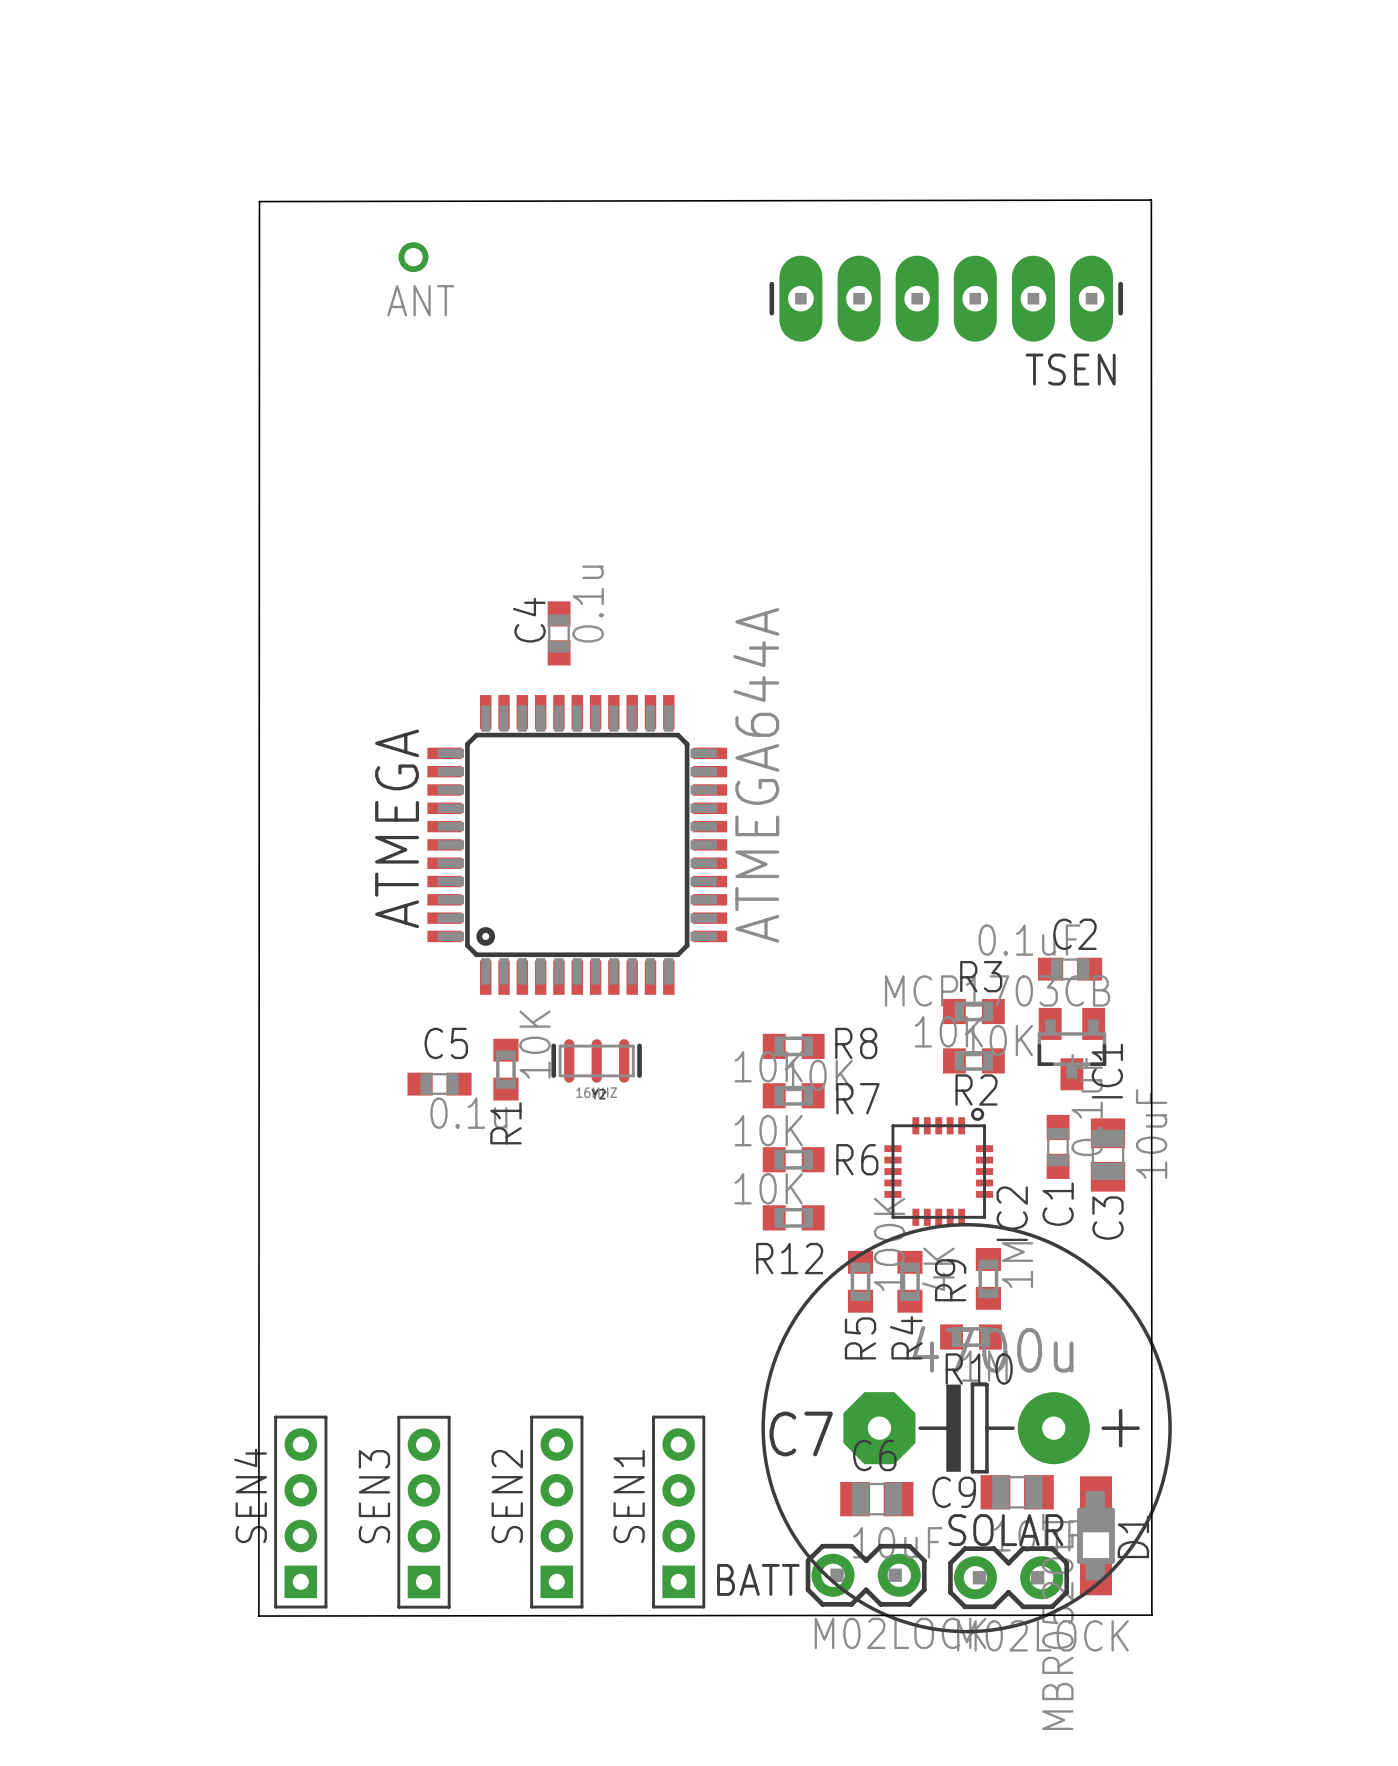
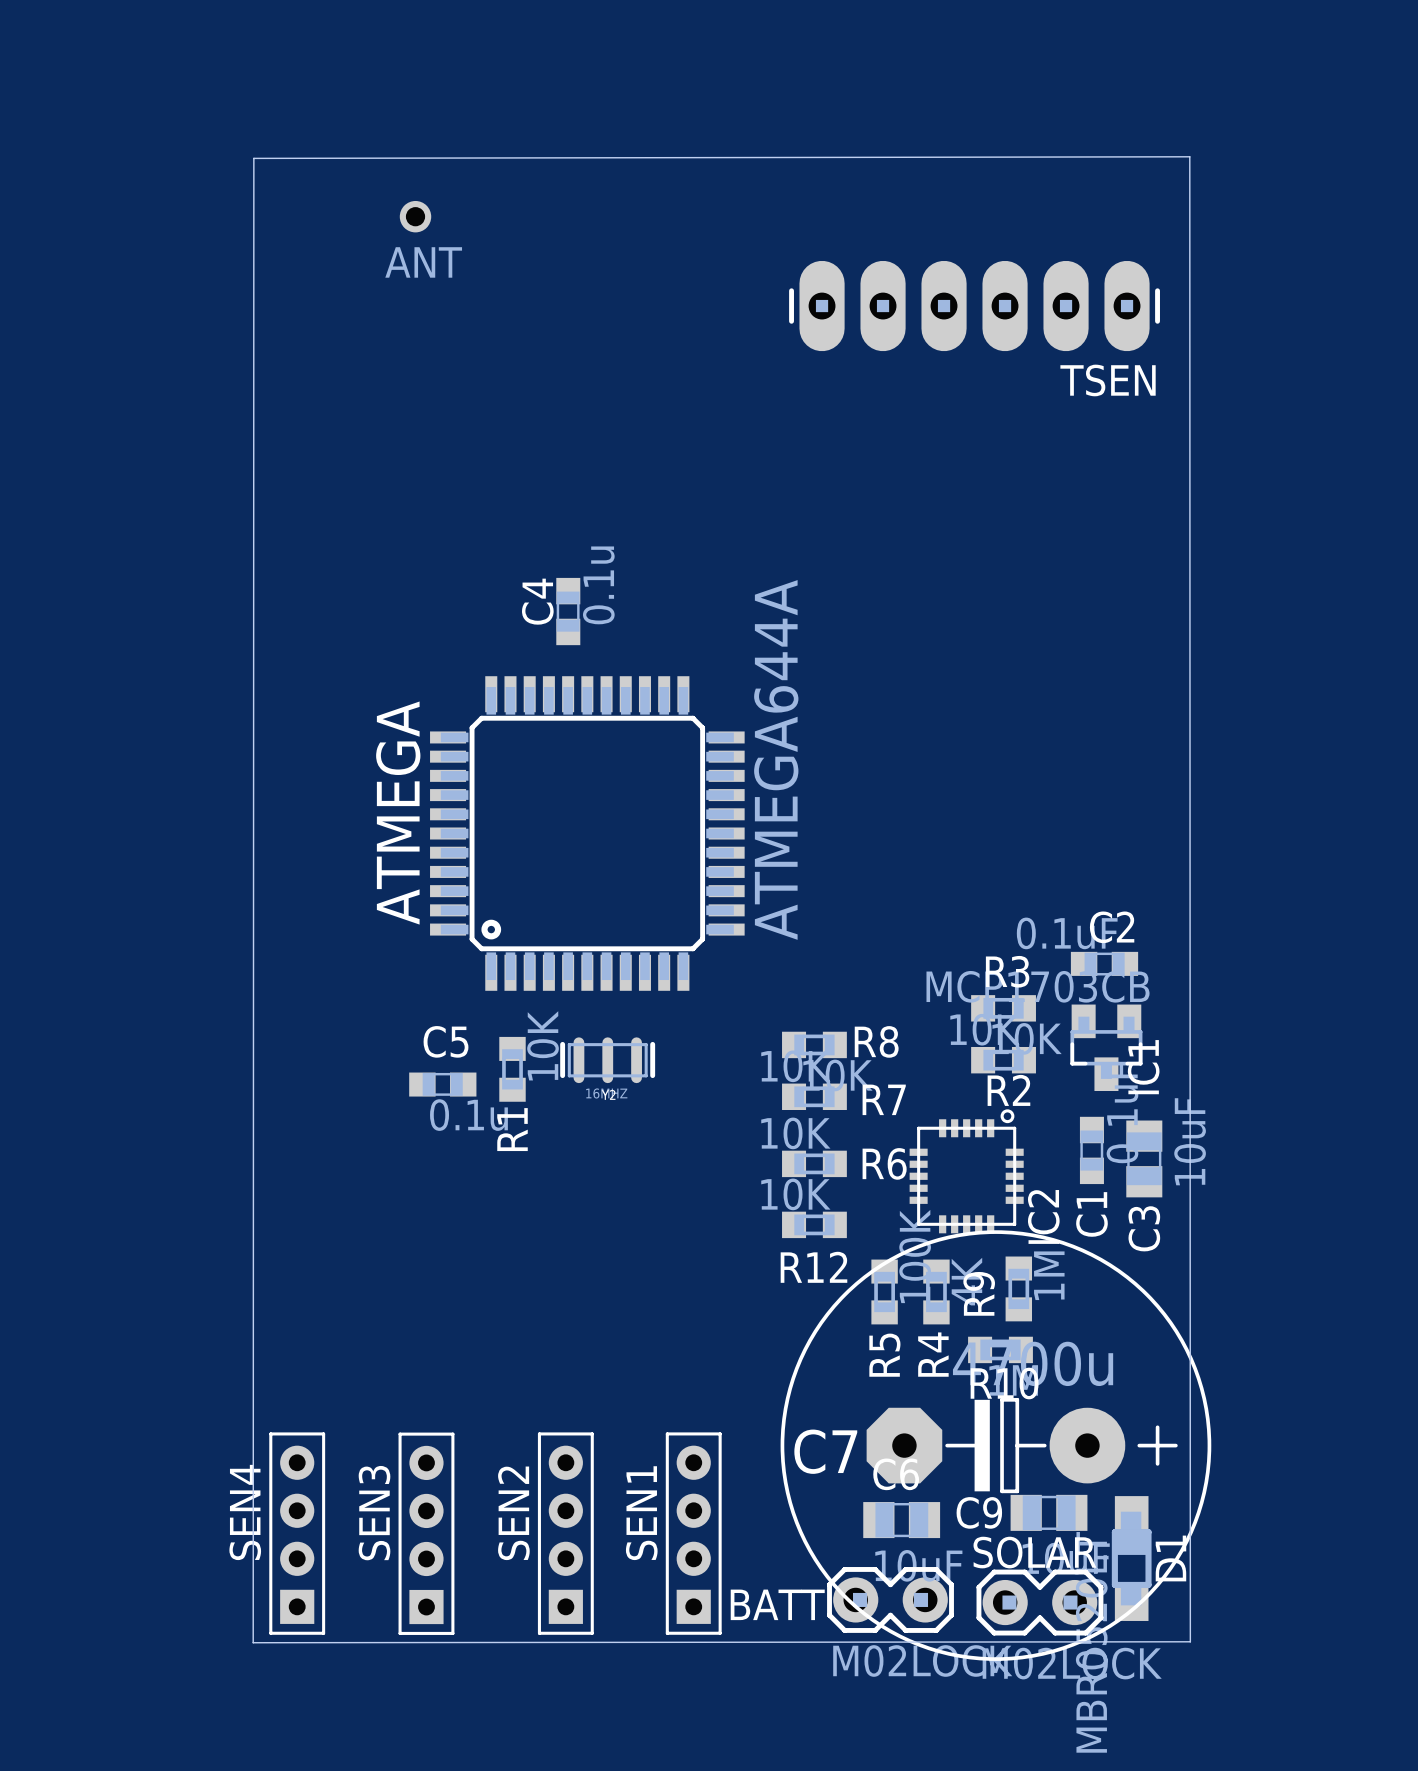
TSEN position: (946, 298) -> (974, 306)

